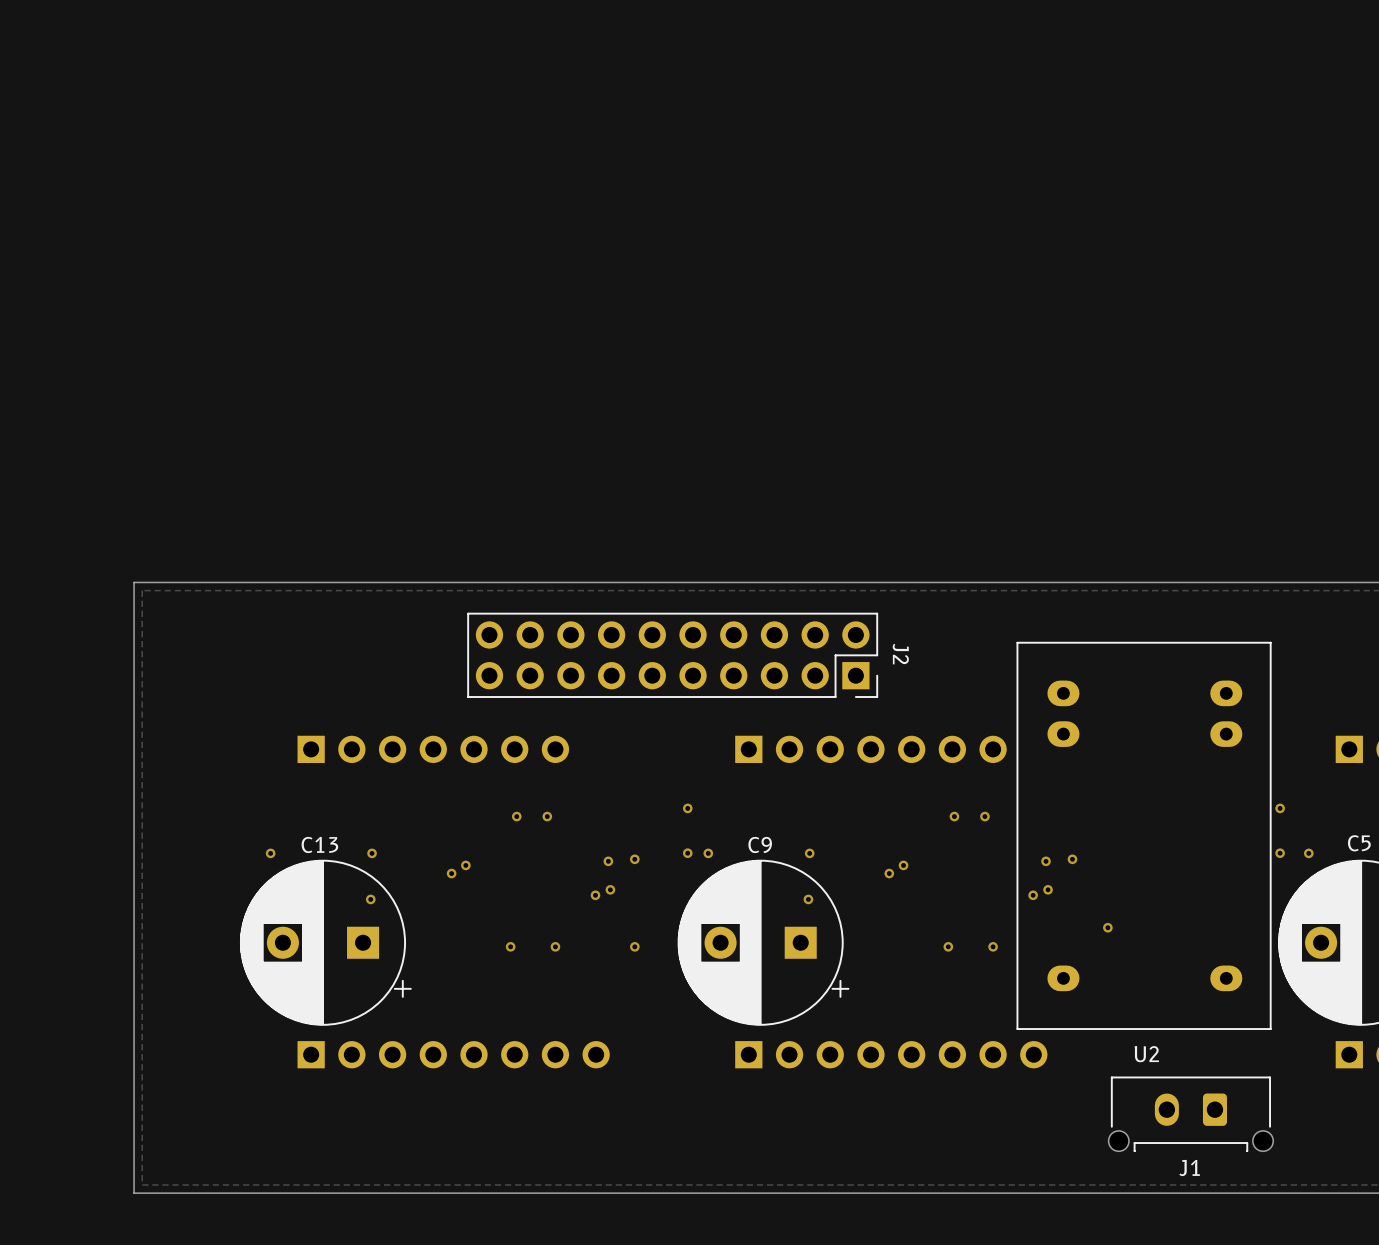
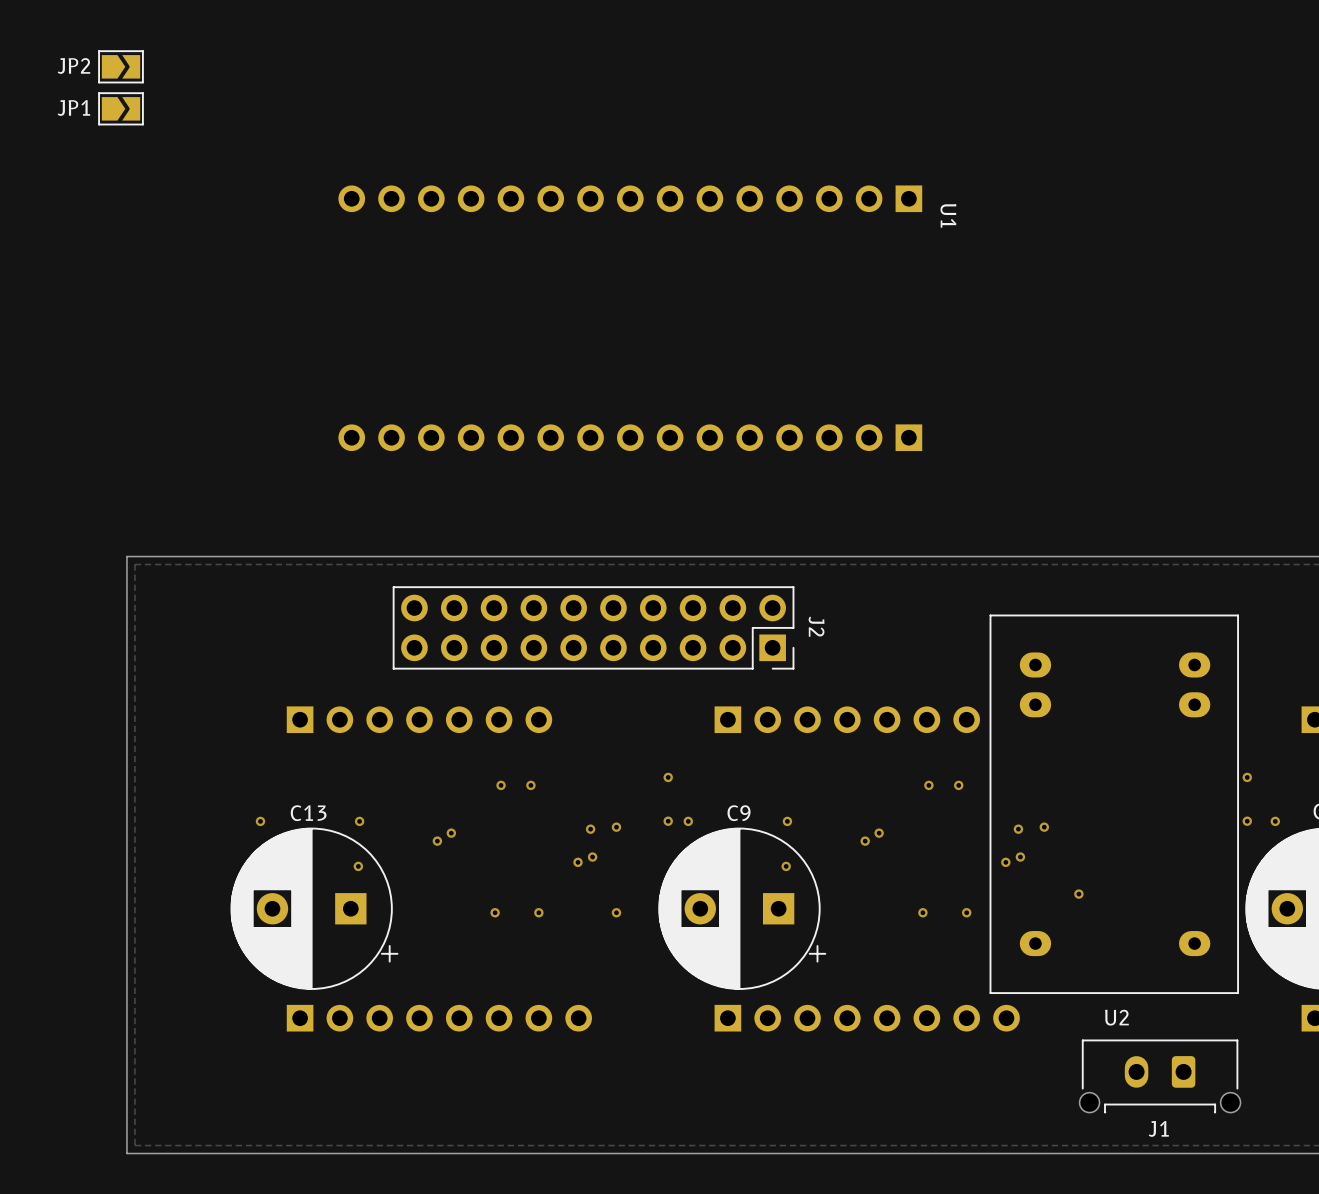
JP2: none -> (120, 66)
JP1: none -> (120, 108)
U1: none -> (630, 318)
J2 position: (672, 655) -> (593, 627)

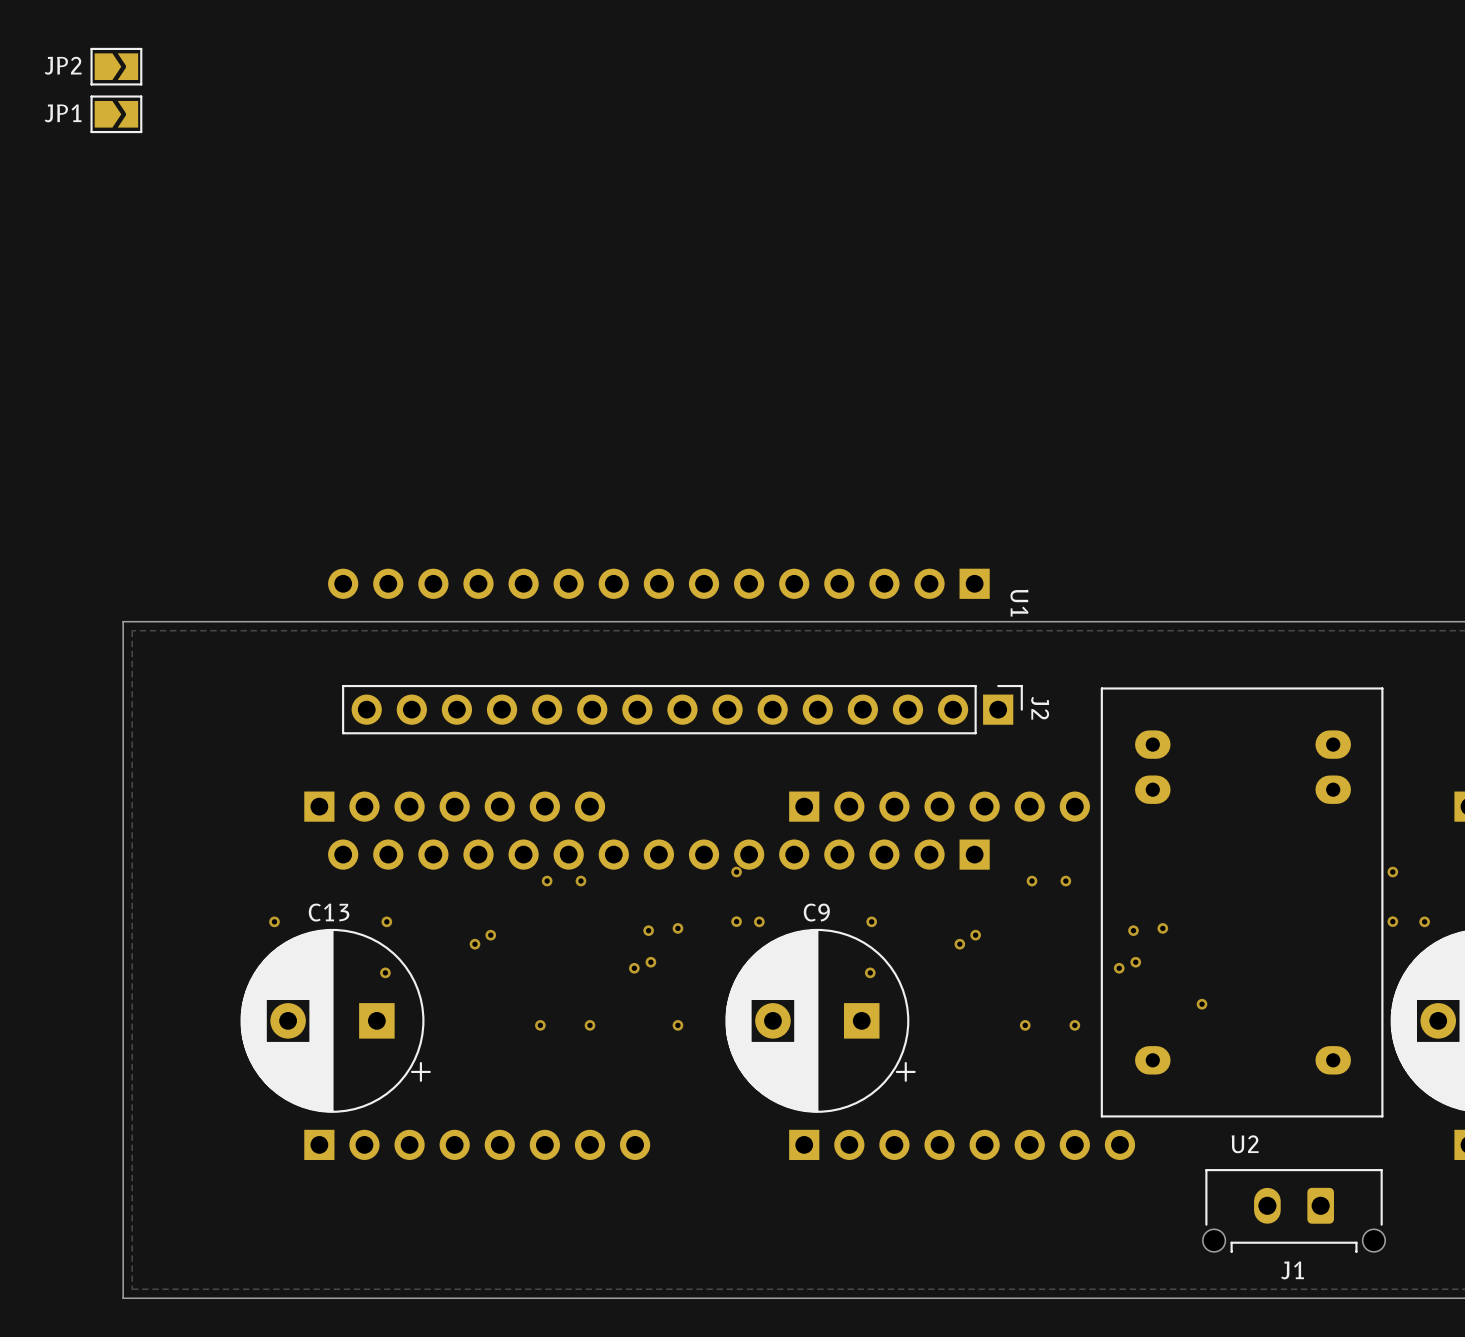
U1 position: (630, 318) -> (658, 719)
J2 footprint: [392, 586, 795, 670] -> [342, 684, 1023, 735]
J2 name position: J2 (816, 626) -> J2 (1040, 708)

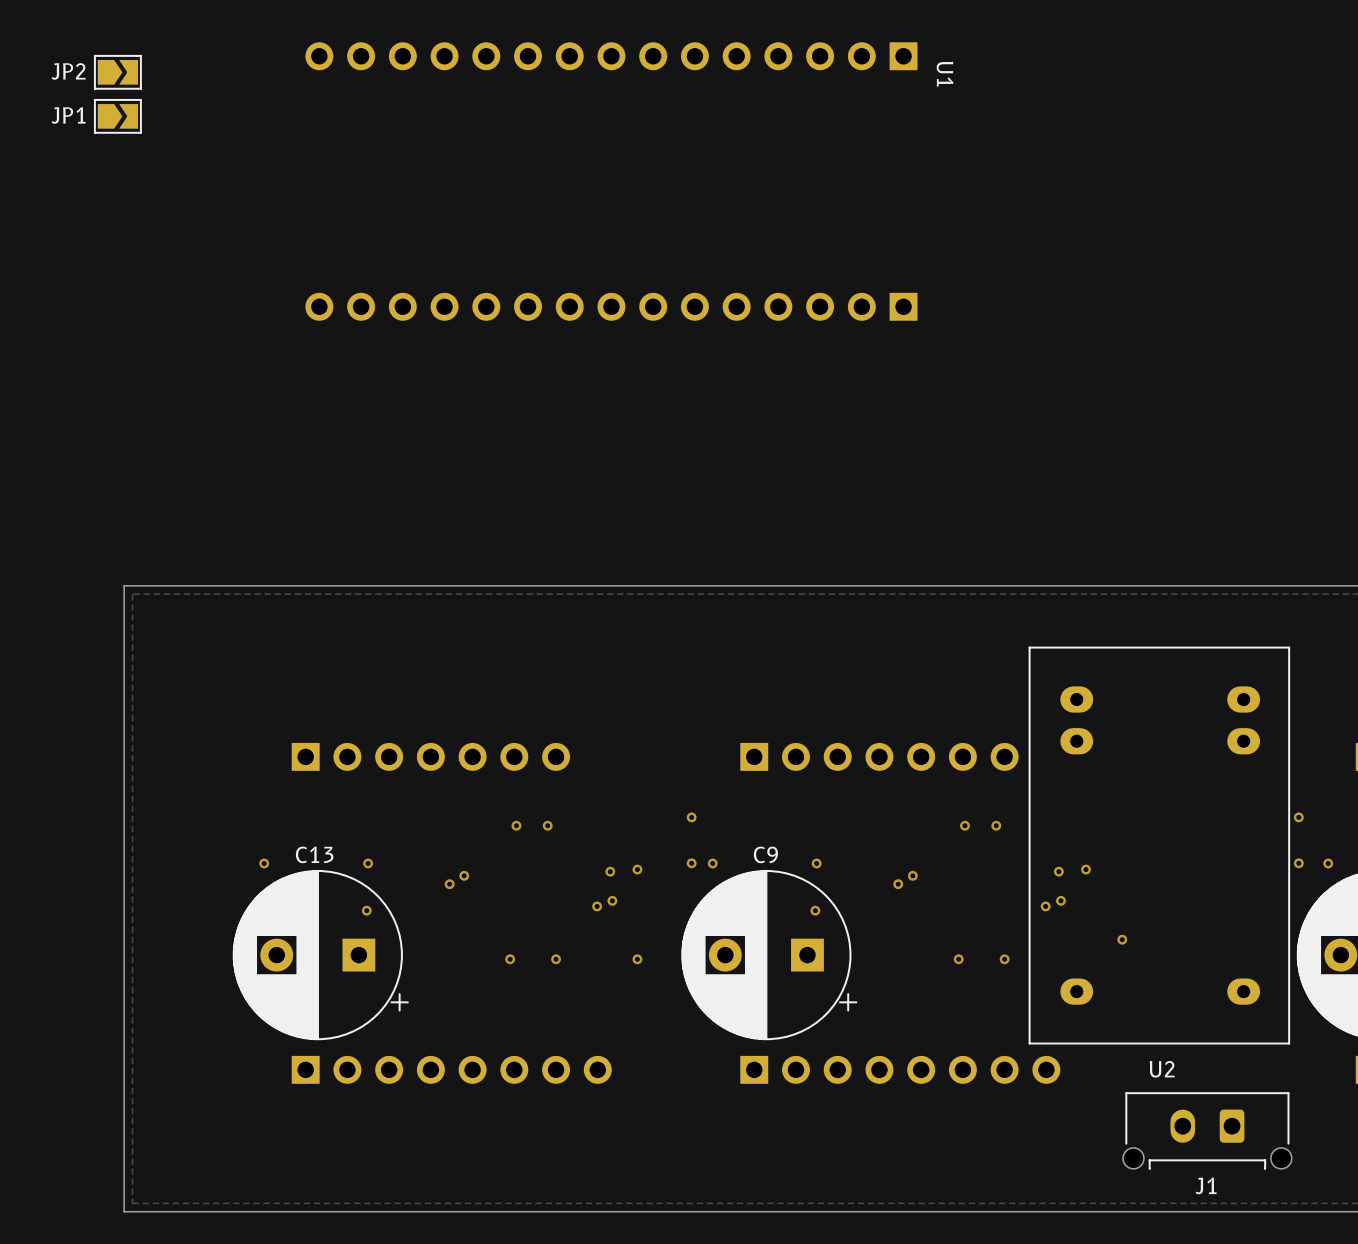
J2: (682, 709) -> none
U1 position: (658, 719) -> (611, 181)

